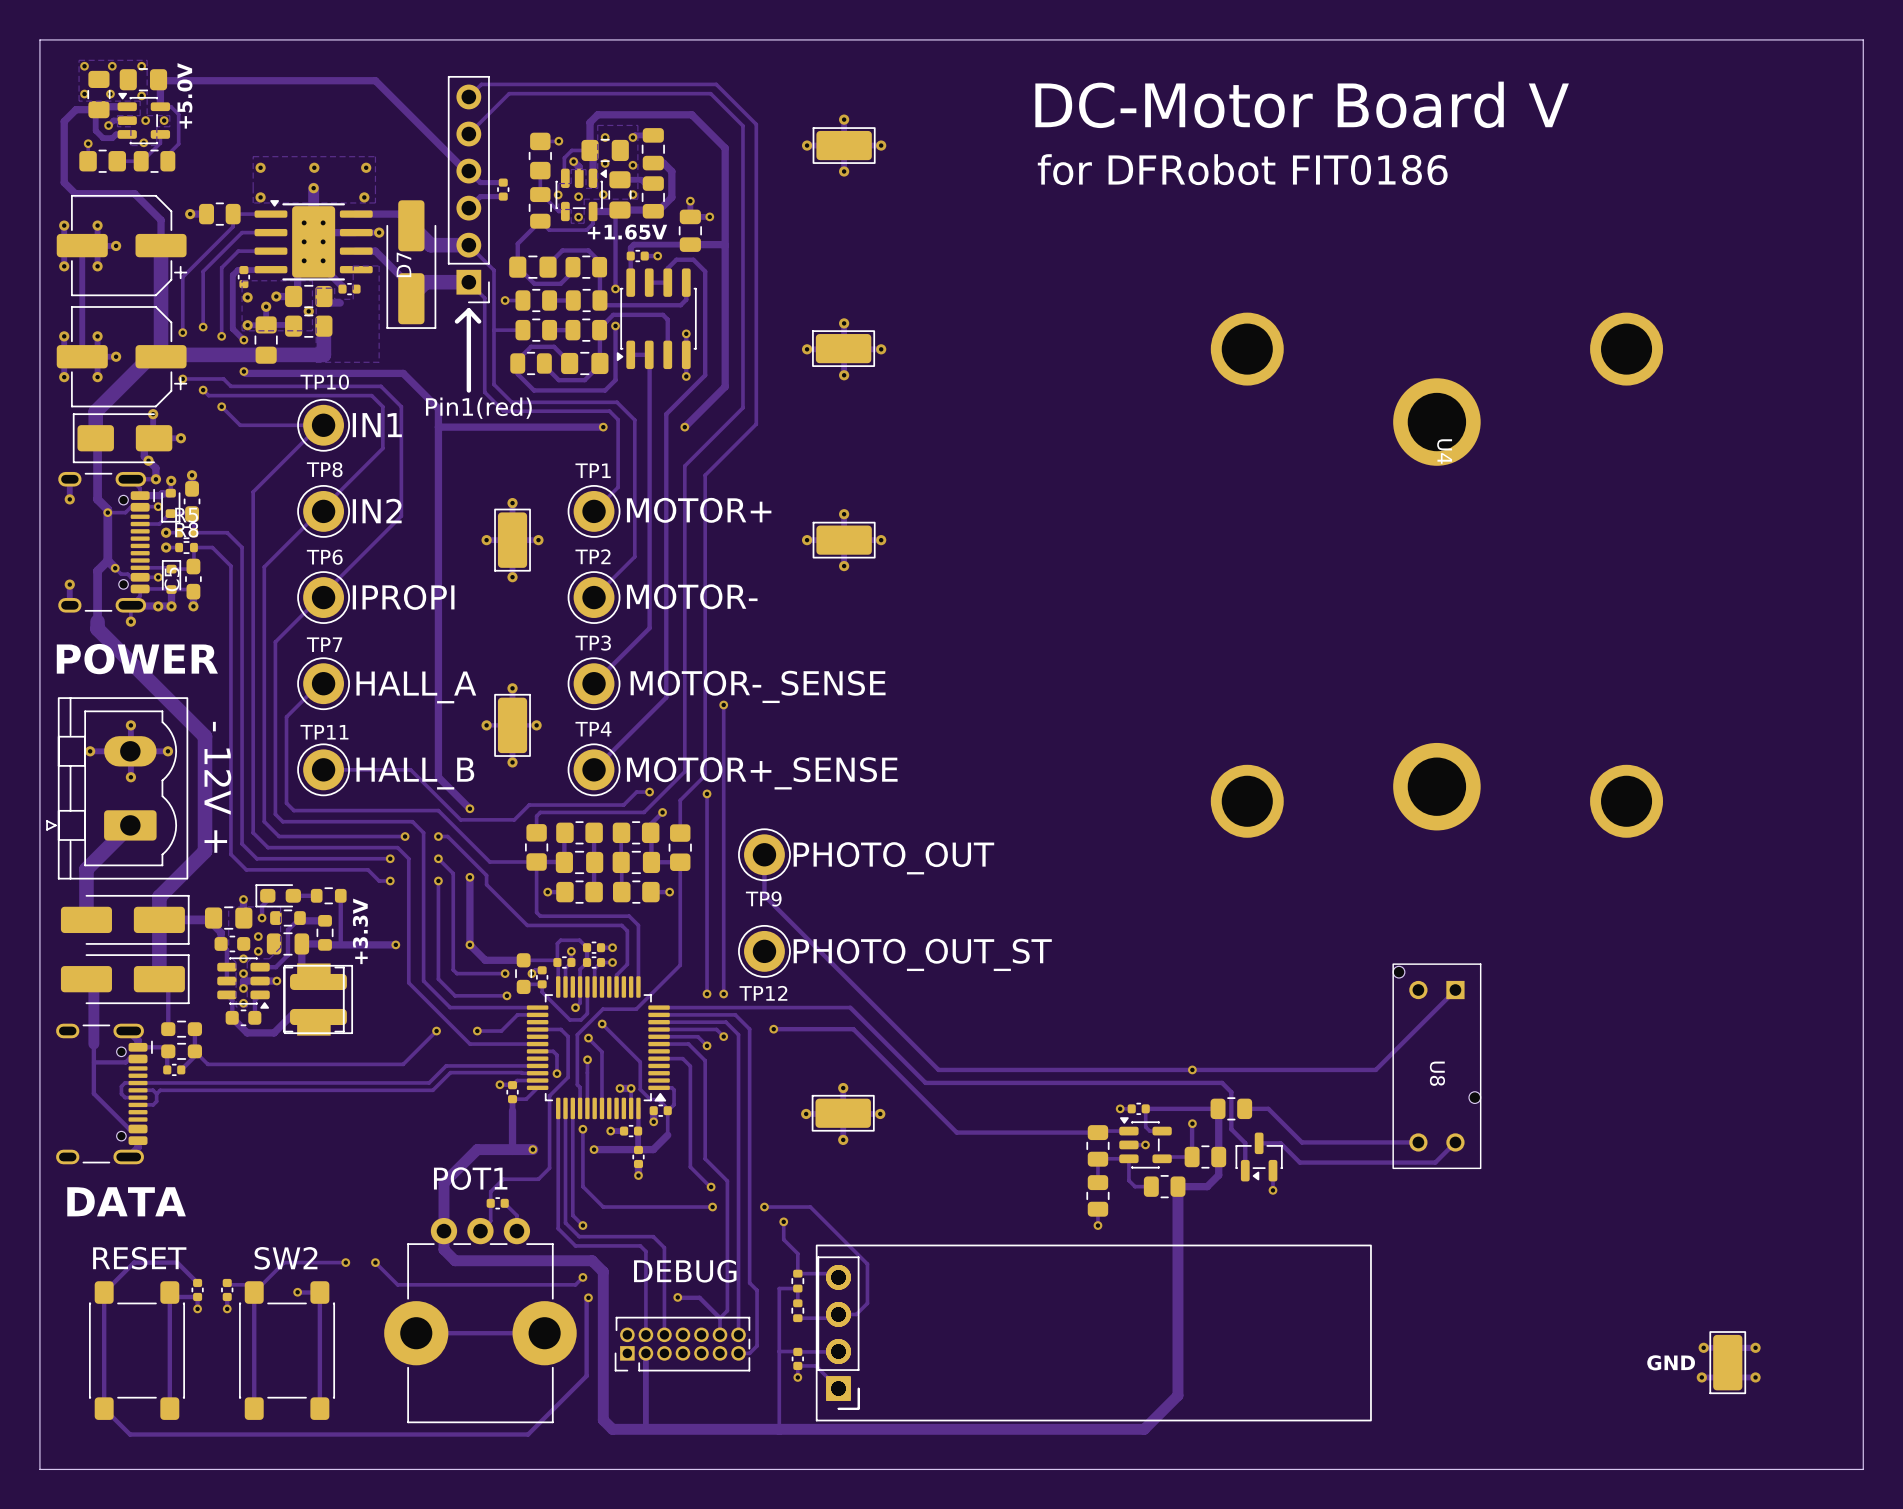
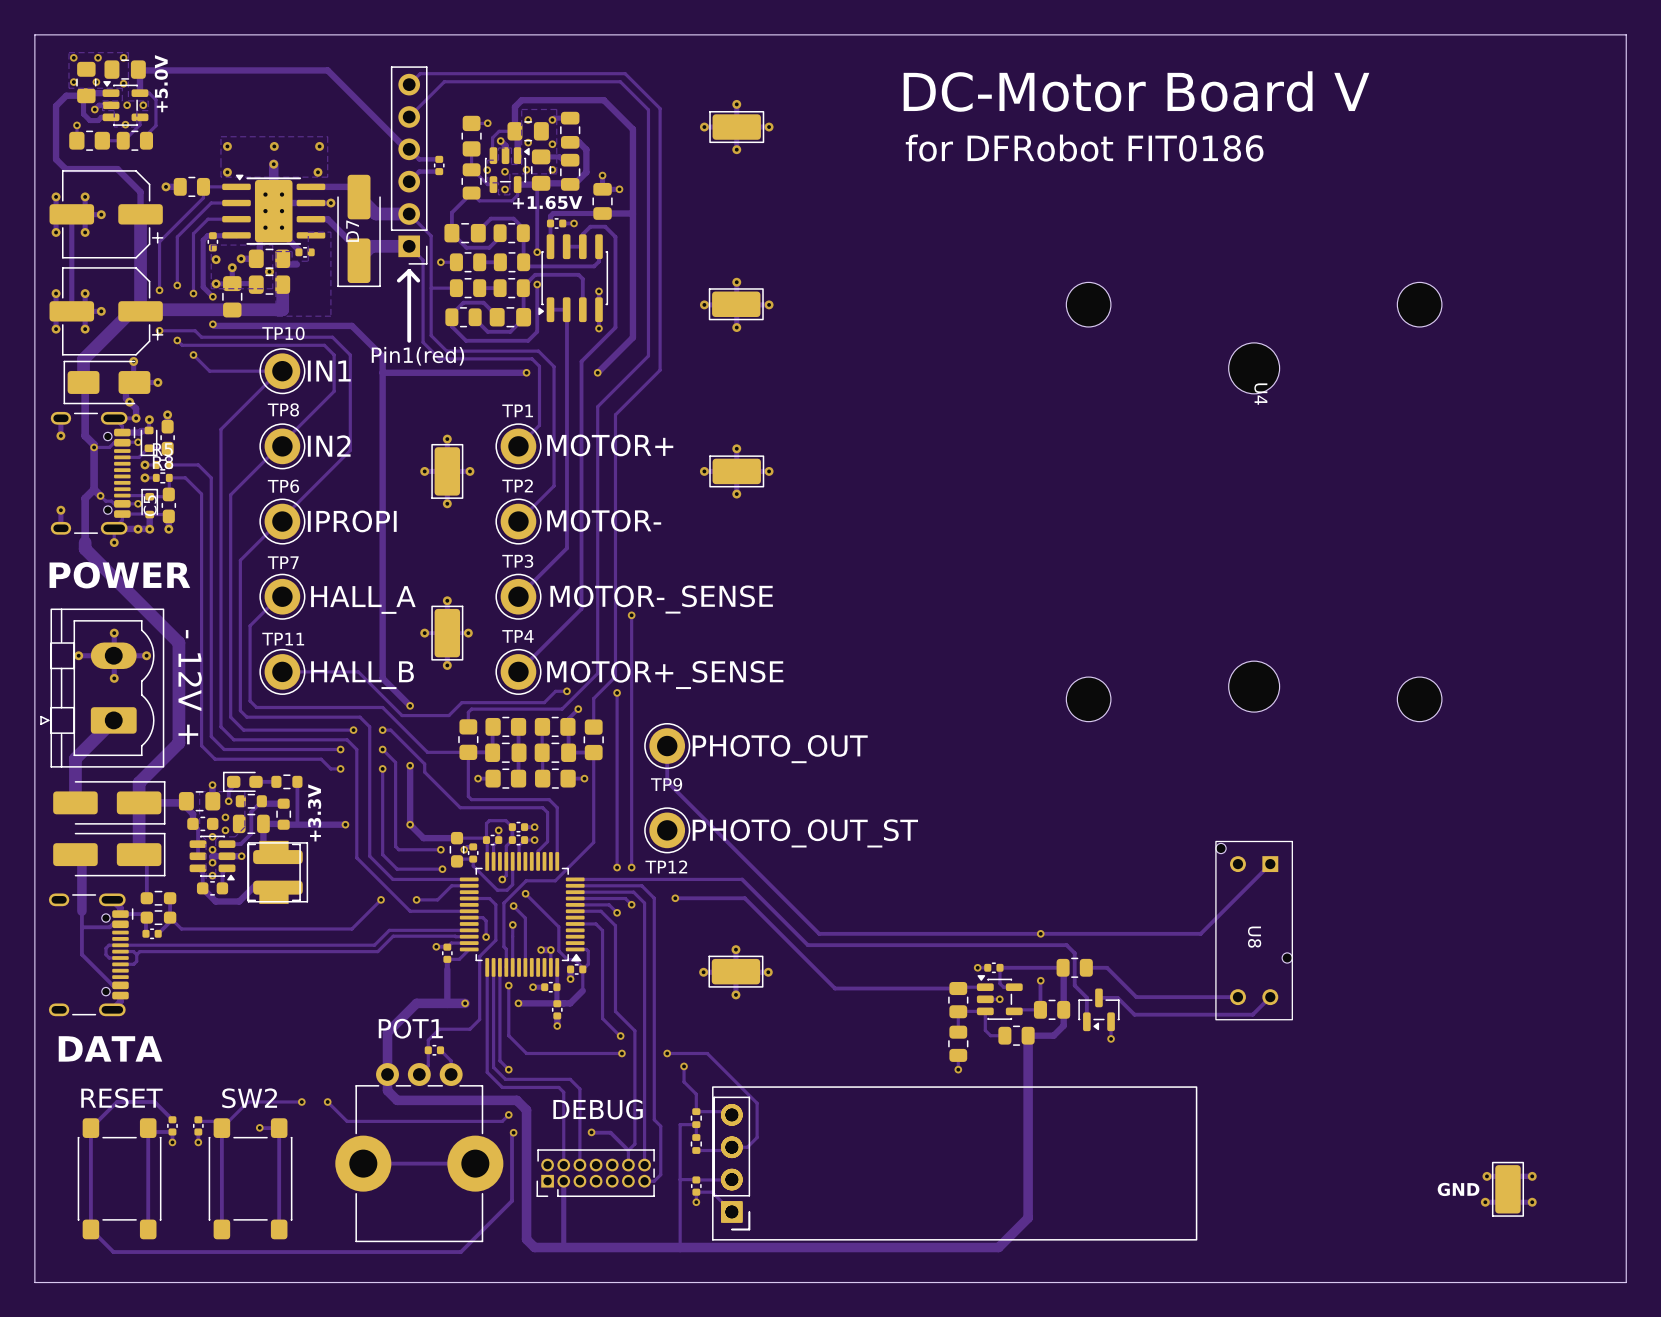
U4 footprint: [1210, 312, 1664, 838] -> [1066, 282, 1442, 722]

